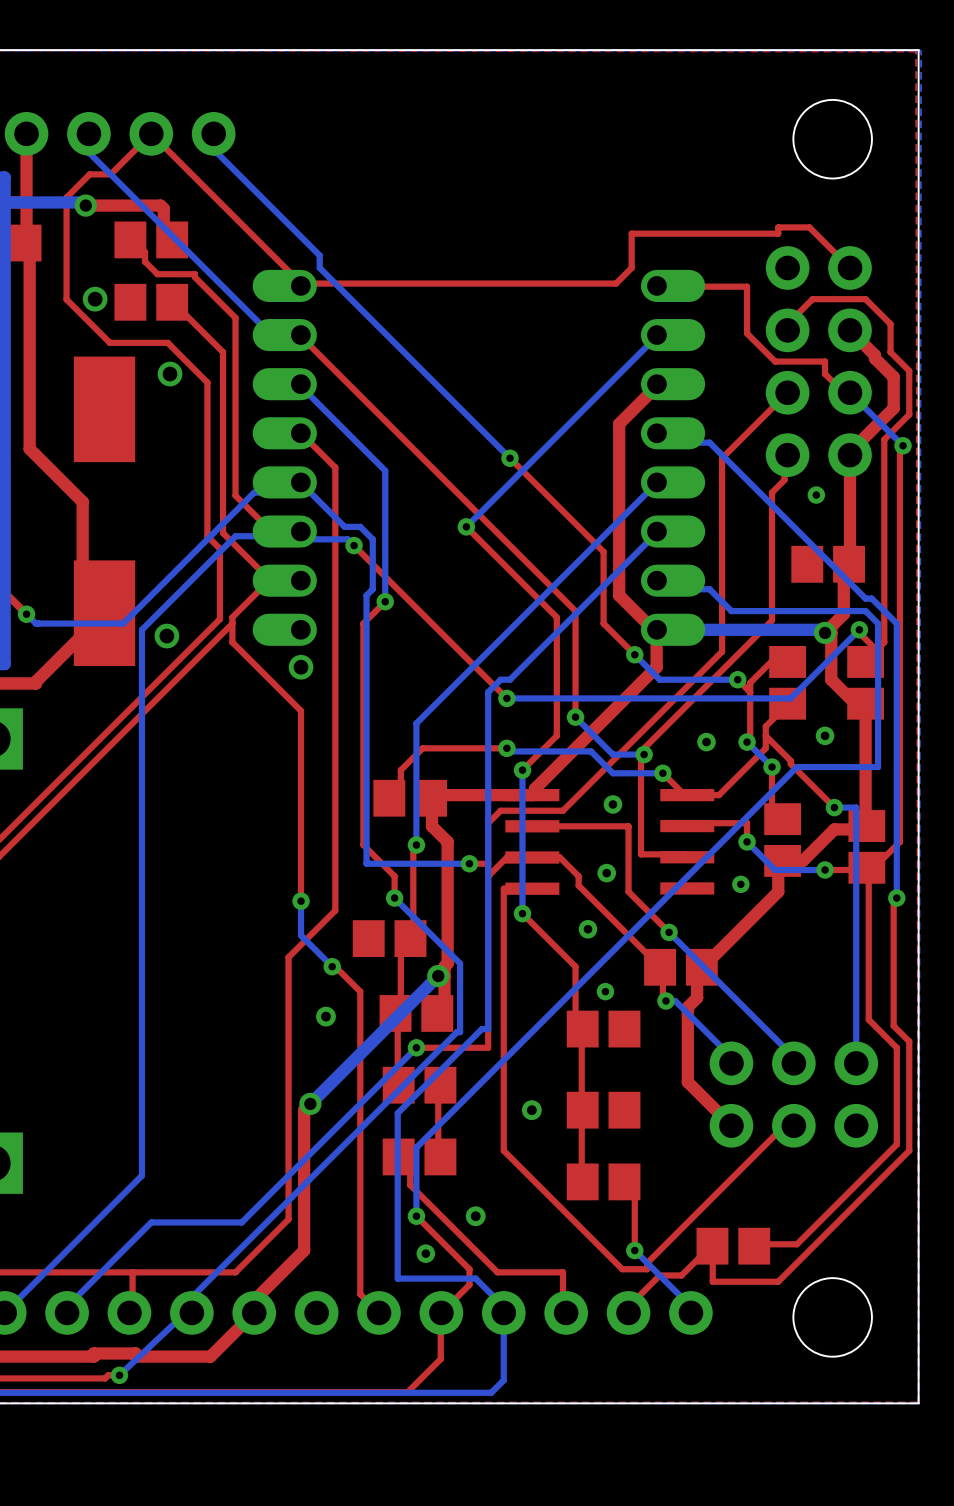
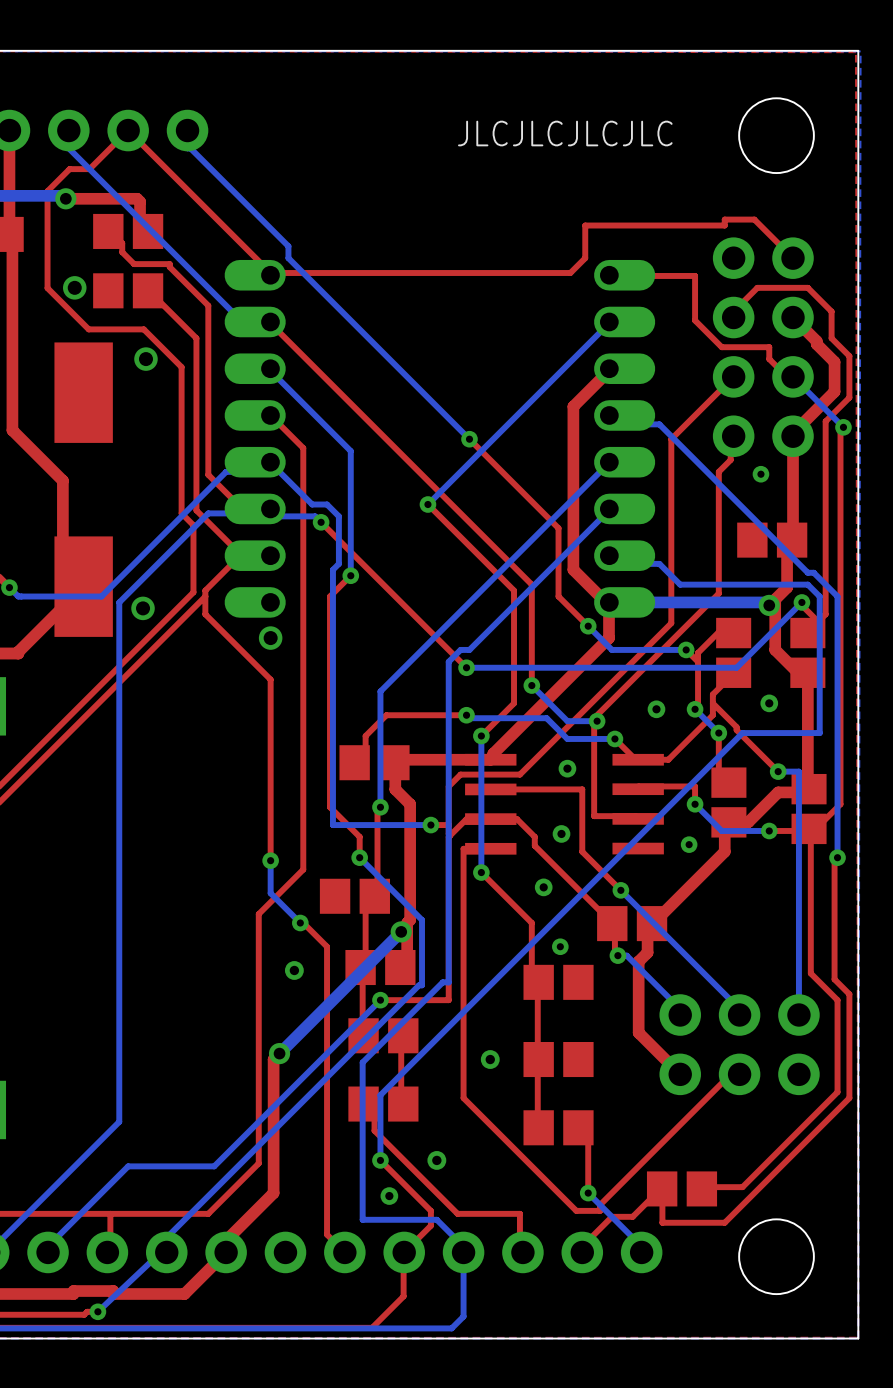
text: none -> JLCJLCJLCJLC (565, 133)

